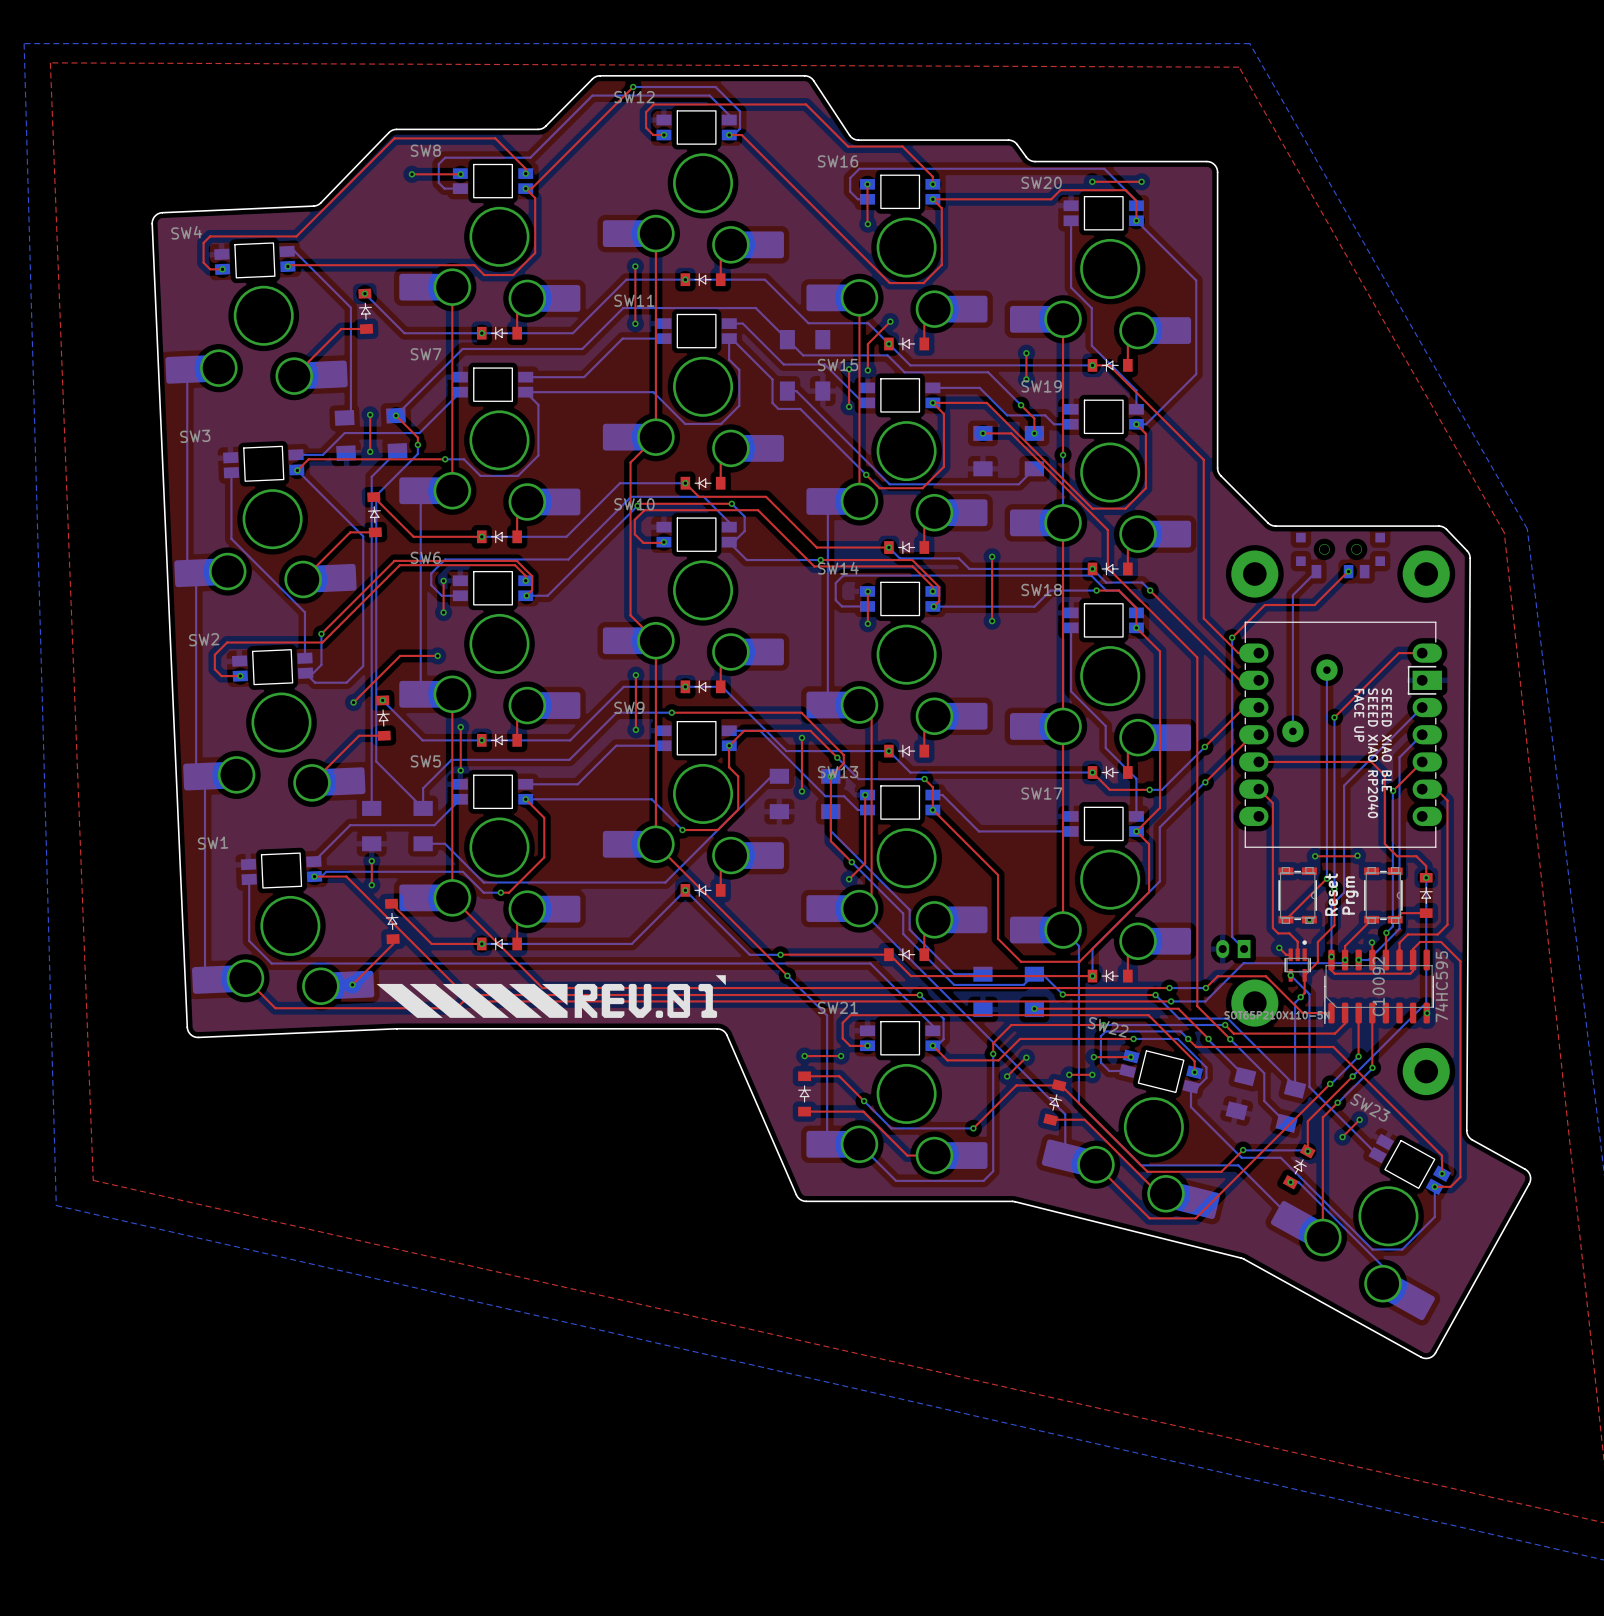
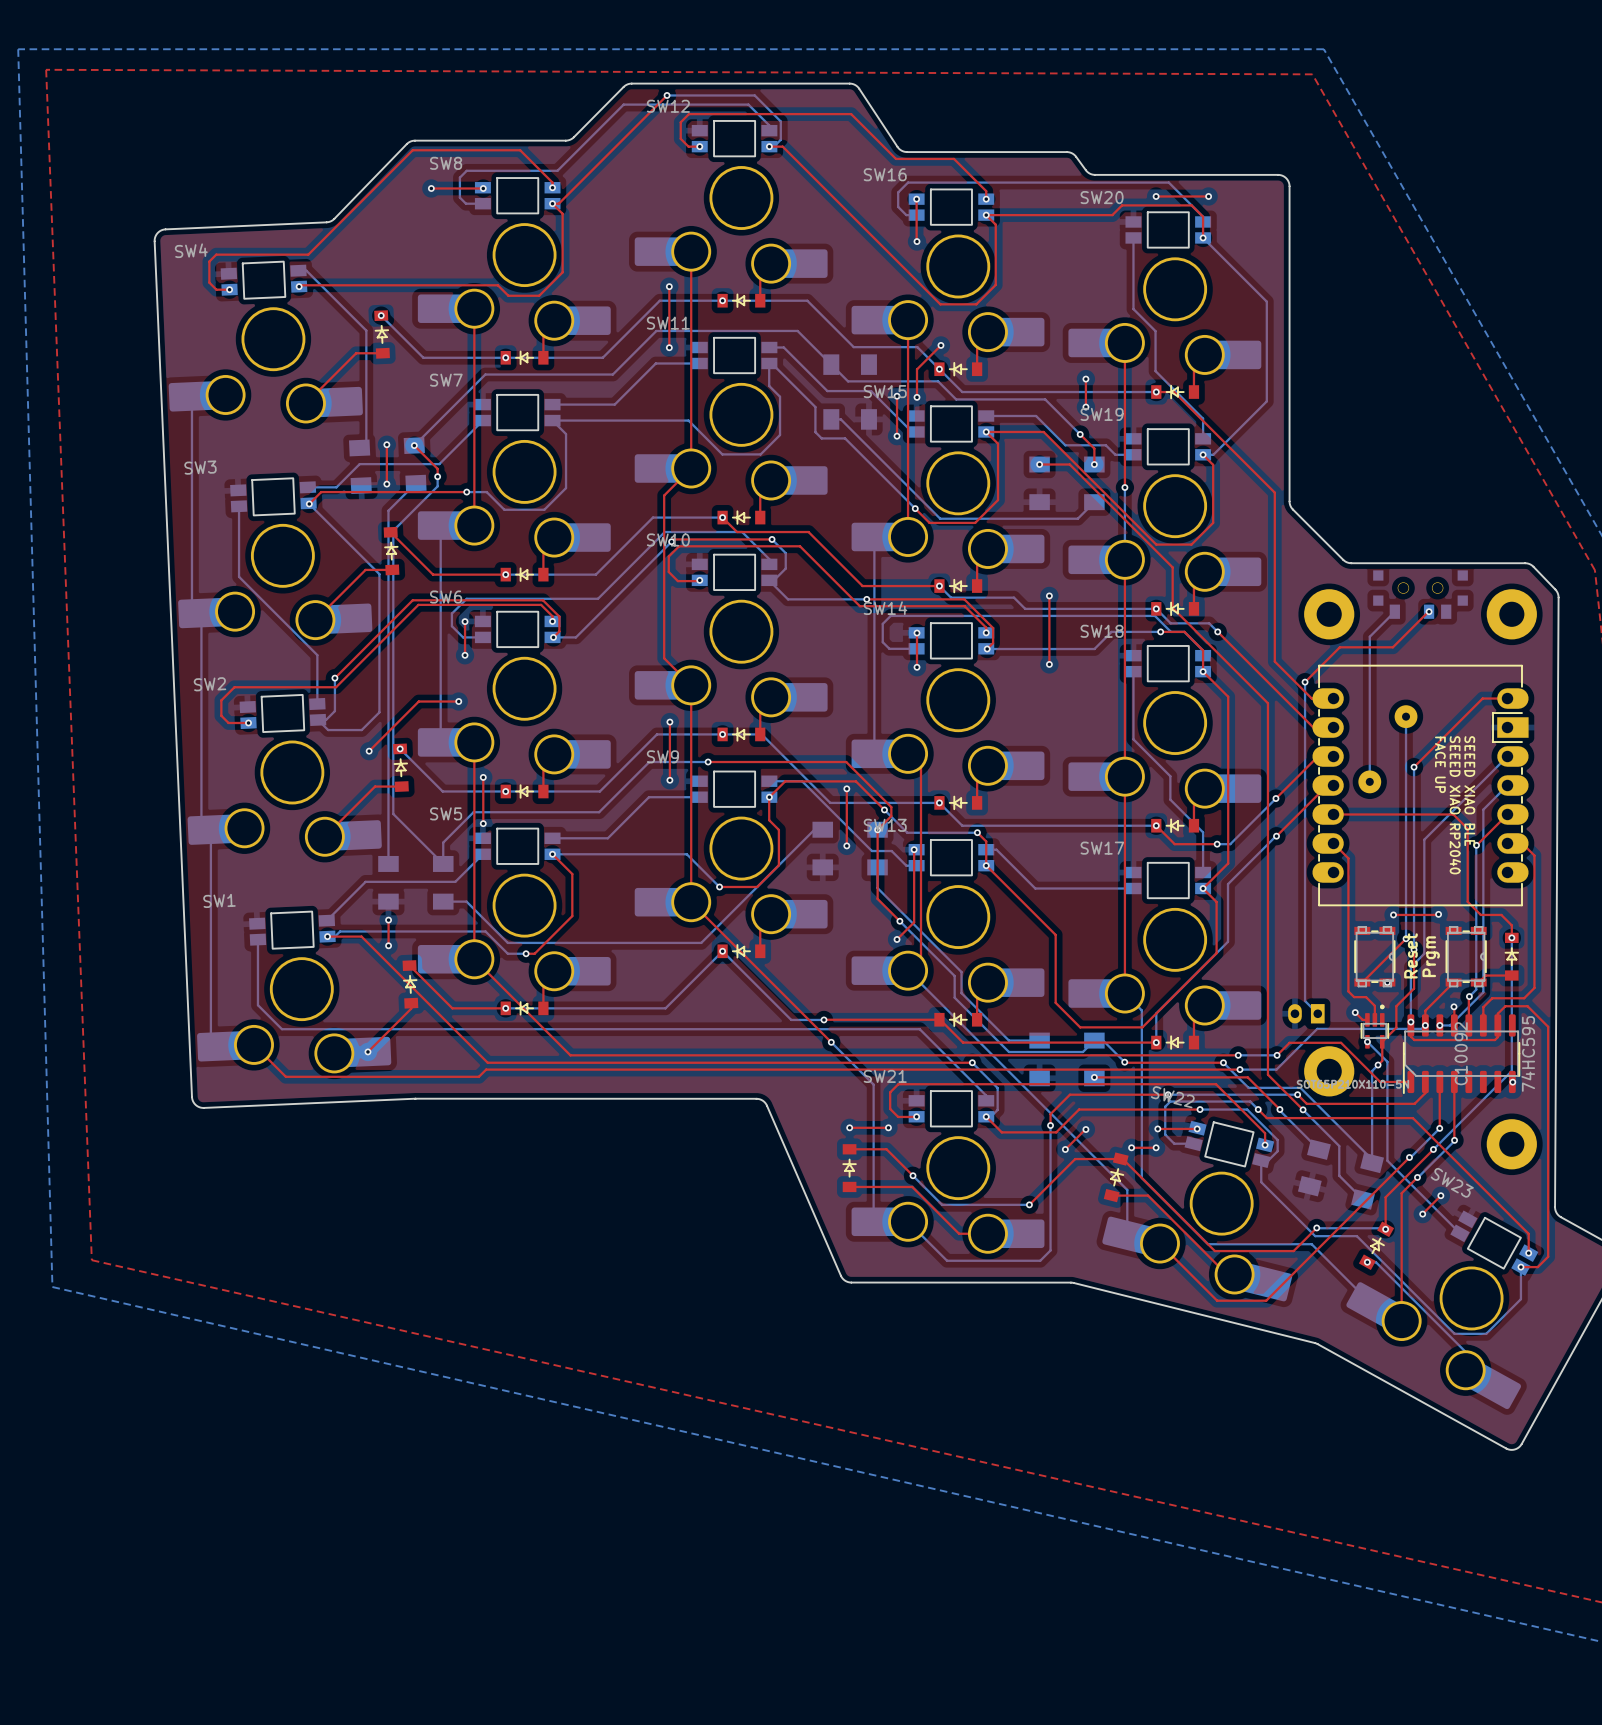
drawing: [376, 975, 726, 1018] -> none

